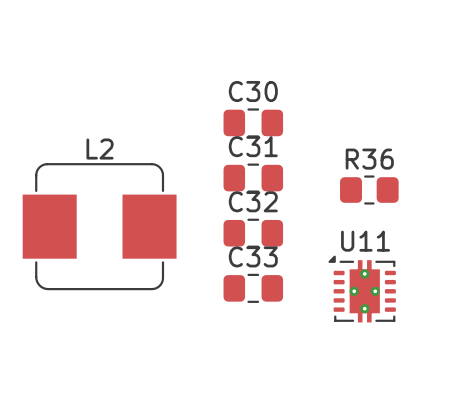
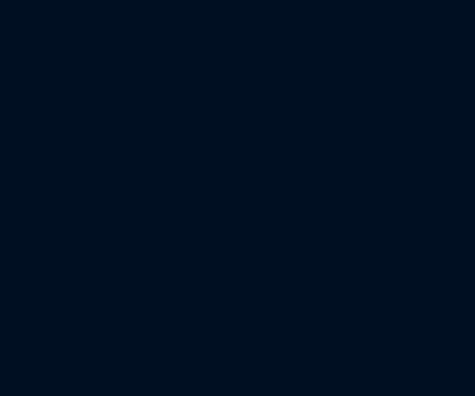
C30: (253, 122) -> none
C31: (253, 178) -> none
R36: (369, 190) -> none
L2: (99, 226) -> none
C32: (253, 233) -> none
C33: (253, 288) -> none
U11: (362, 289) -> none

